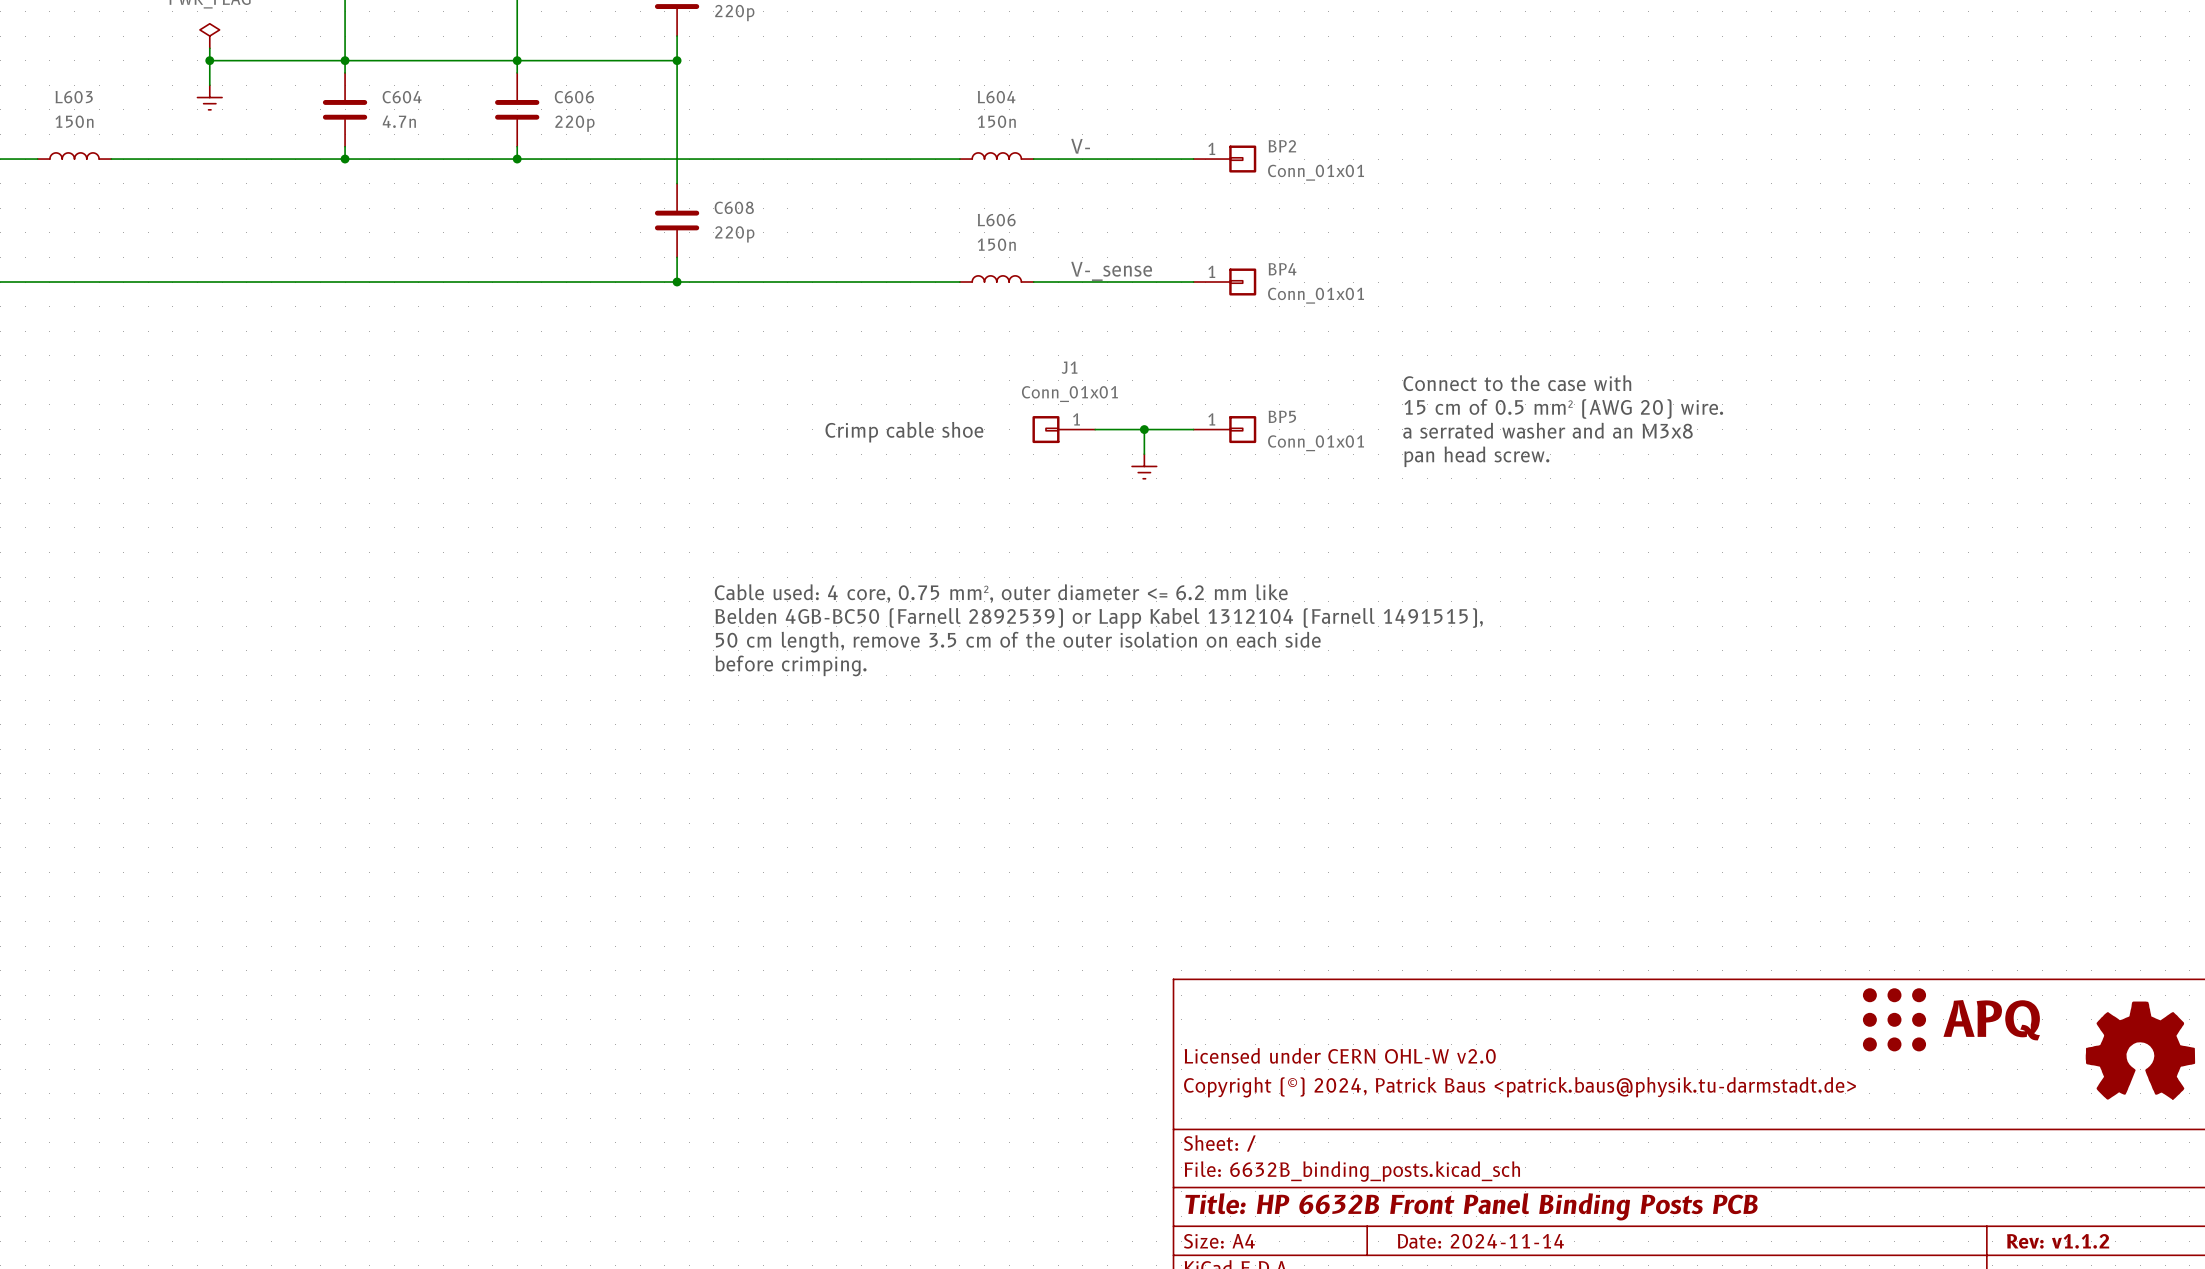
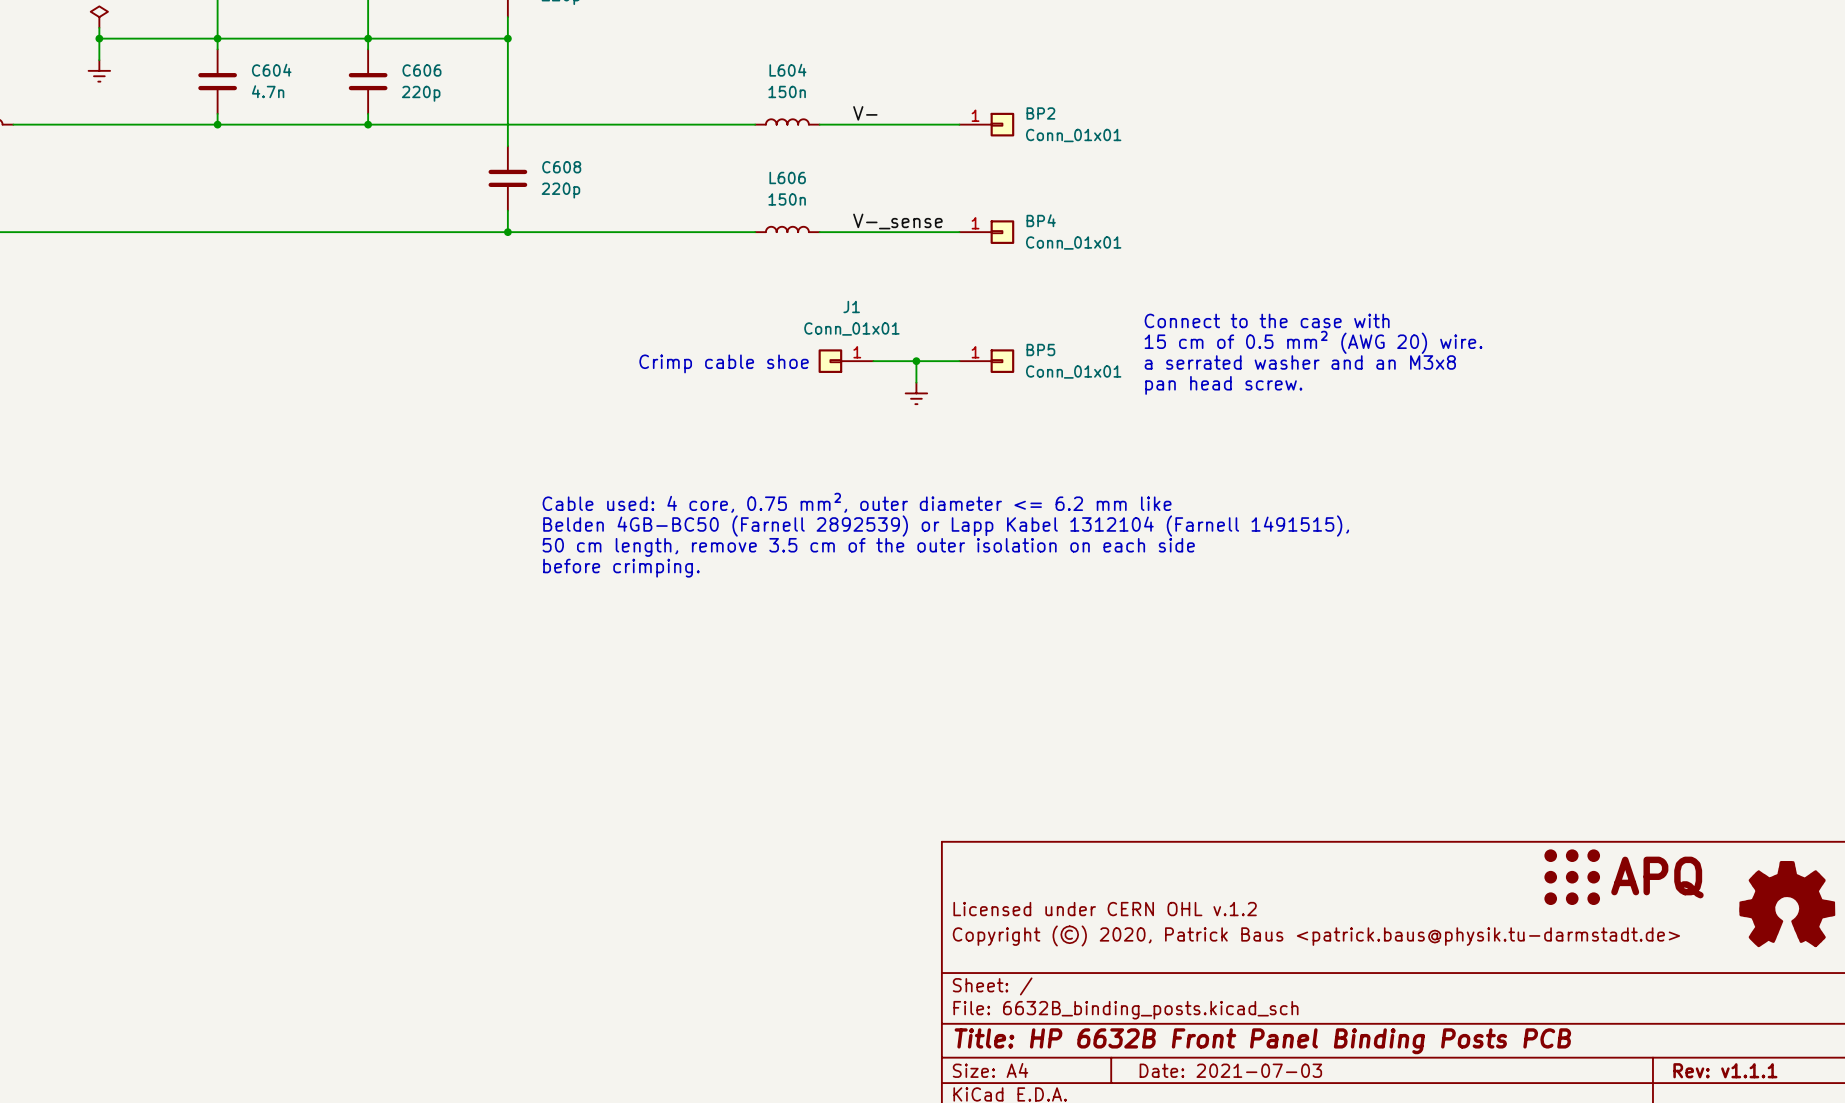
title block: Licensed under CERN OHL-W v2.0 (1340, 1055) -> Licensed under CERN OHL v.1.2 (1105, 909)
title block: Copyright (©) 2024, Patrick Baus <patrick.baus@physik.tu-darmstadt.de> (1519, 1087) -> Copyright (©) 2020, Patrick Baus <patrick.baus@physik.tu-darmstadt.de> (1316, 935)
title block: Date: 2024-11-14 (1480, 1241) -> Date: 2021-07-03 (1230, 1070)
title block: Rev: v1.1.2 (2058, 1241) -> Rev: v1.1.1 (1725, 1070)

